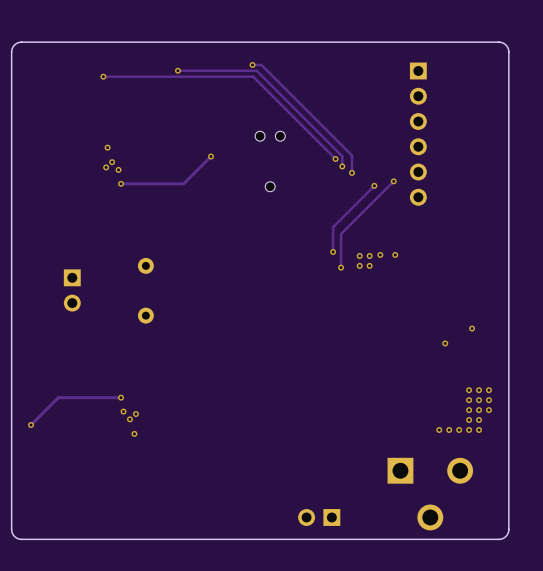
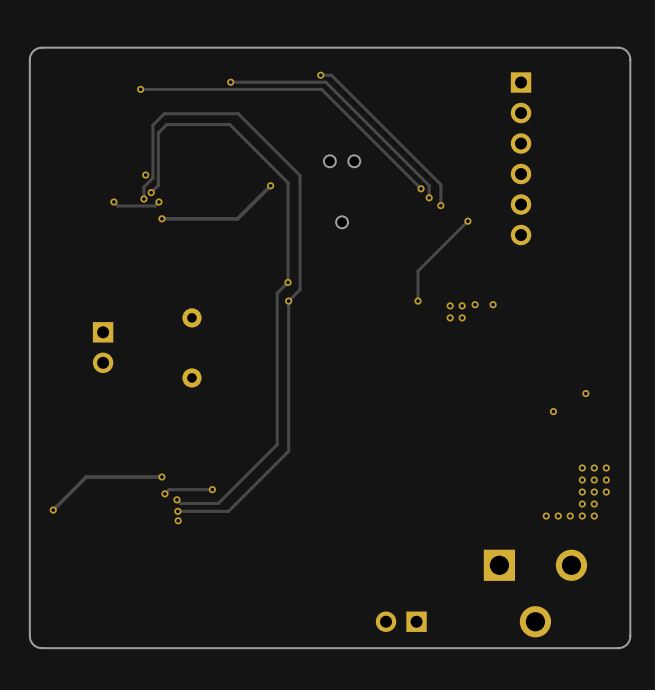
track: none -> (151, 192) (158, 185) (158, 132) (166, 124) (229, 124) (288, 182) (288, 282) (277, 293) (277, 444) (218, 503) (180, 503) (176, 499)
track: none -> (143, 199) (143, 187) (152, 178) (152, 125) (164, 113) (238, 113) (300, 175) (300, 289) (288, 301) (288, 451) (228, 511) (177, 511)
via: none -> (113, 202)
track: none -> (158, 202) (154, 205) (117, 205) (113, 202)
track: (393, 181) (341, 234) (341, 267) -> none
via: (393, 181) -> none
via: none -> (288, 282)
via: none -> (288, 301)
via: (341, 267) -> none
track: none -> (212, 489) (169, 489) (164, 493)
via: none -> (212, 489)
via: (135, 414) -> none
via: none -> (176, 499)
via: (129, 419) -> none
via: none -> (177, 511)

